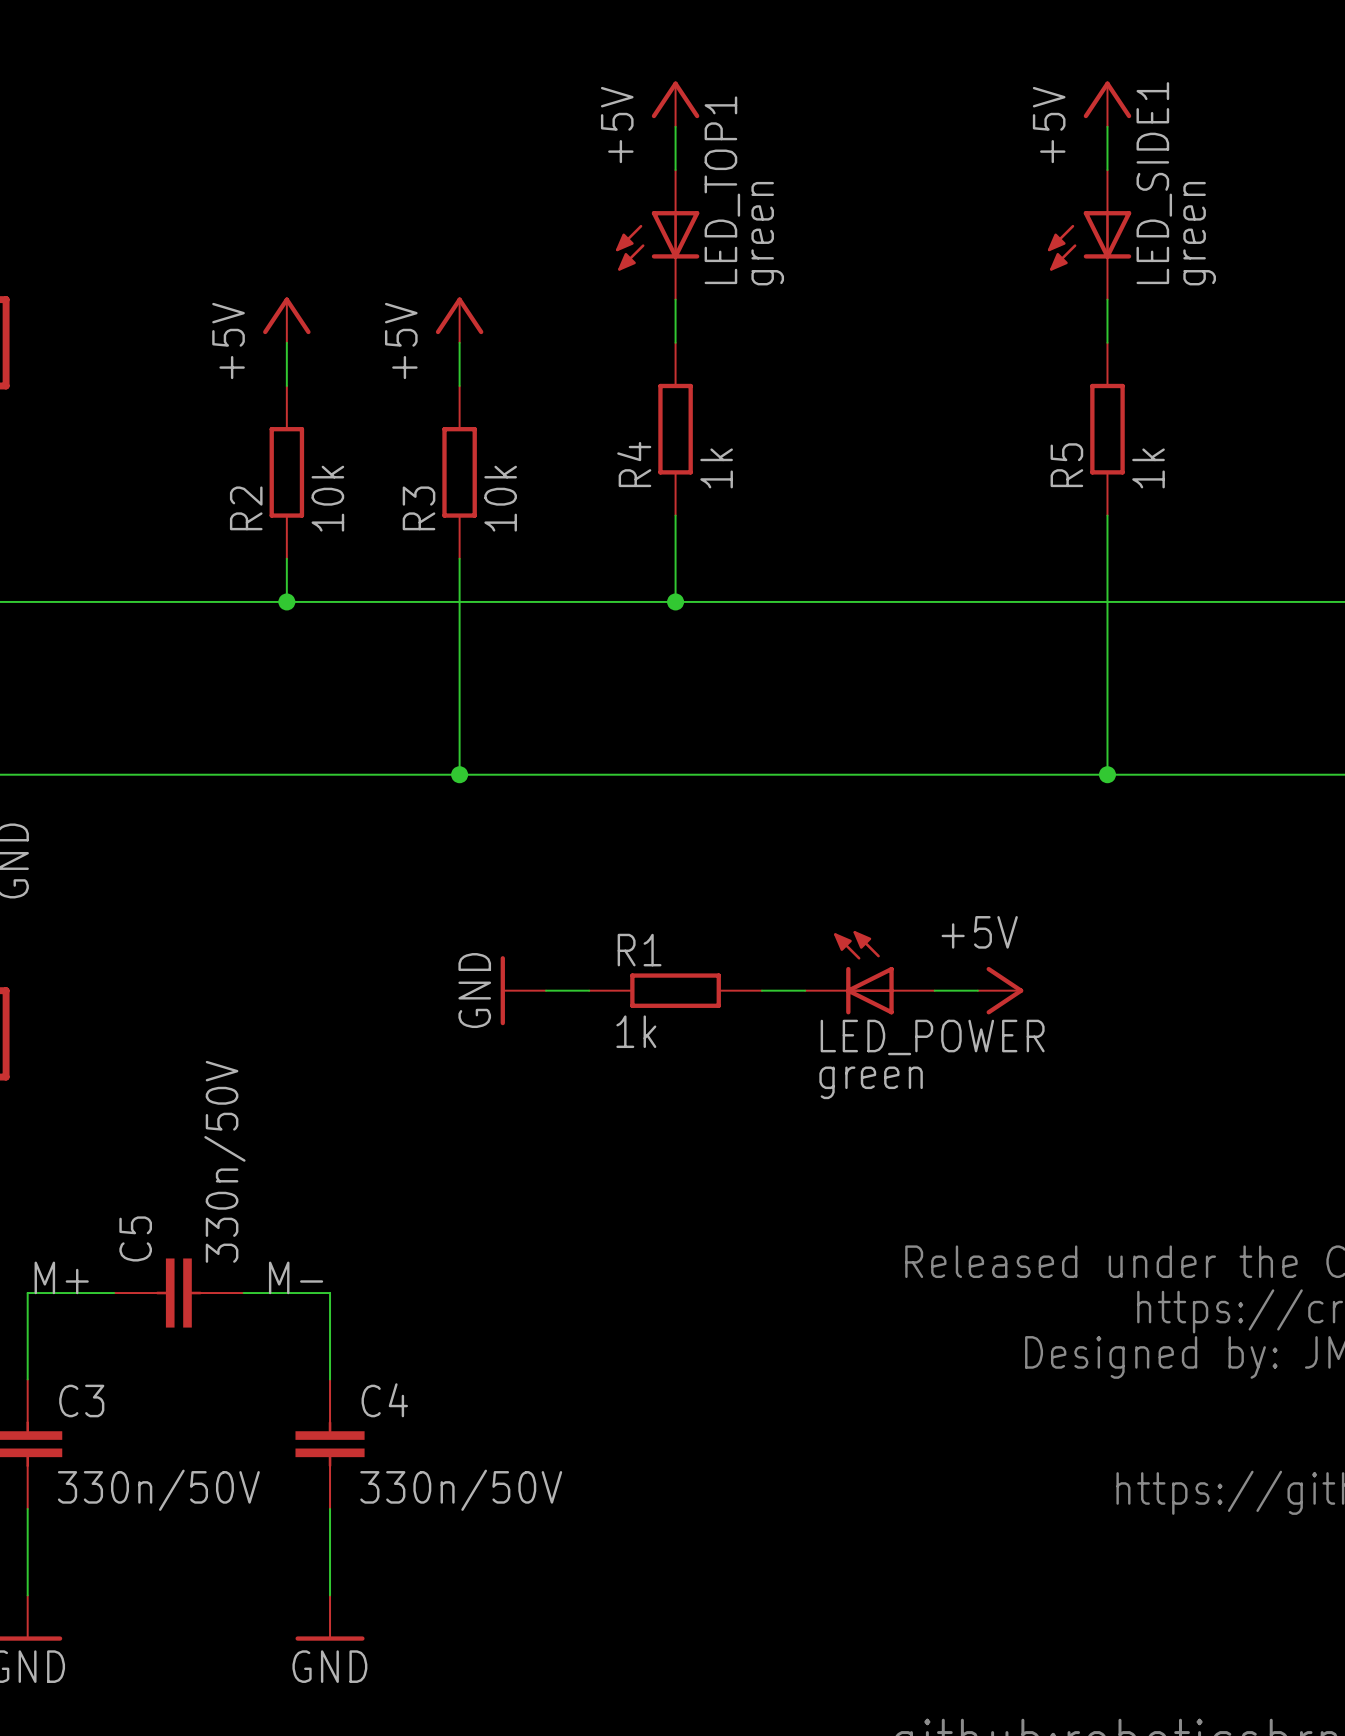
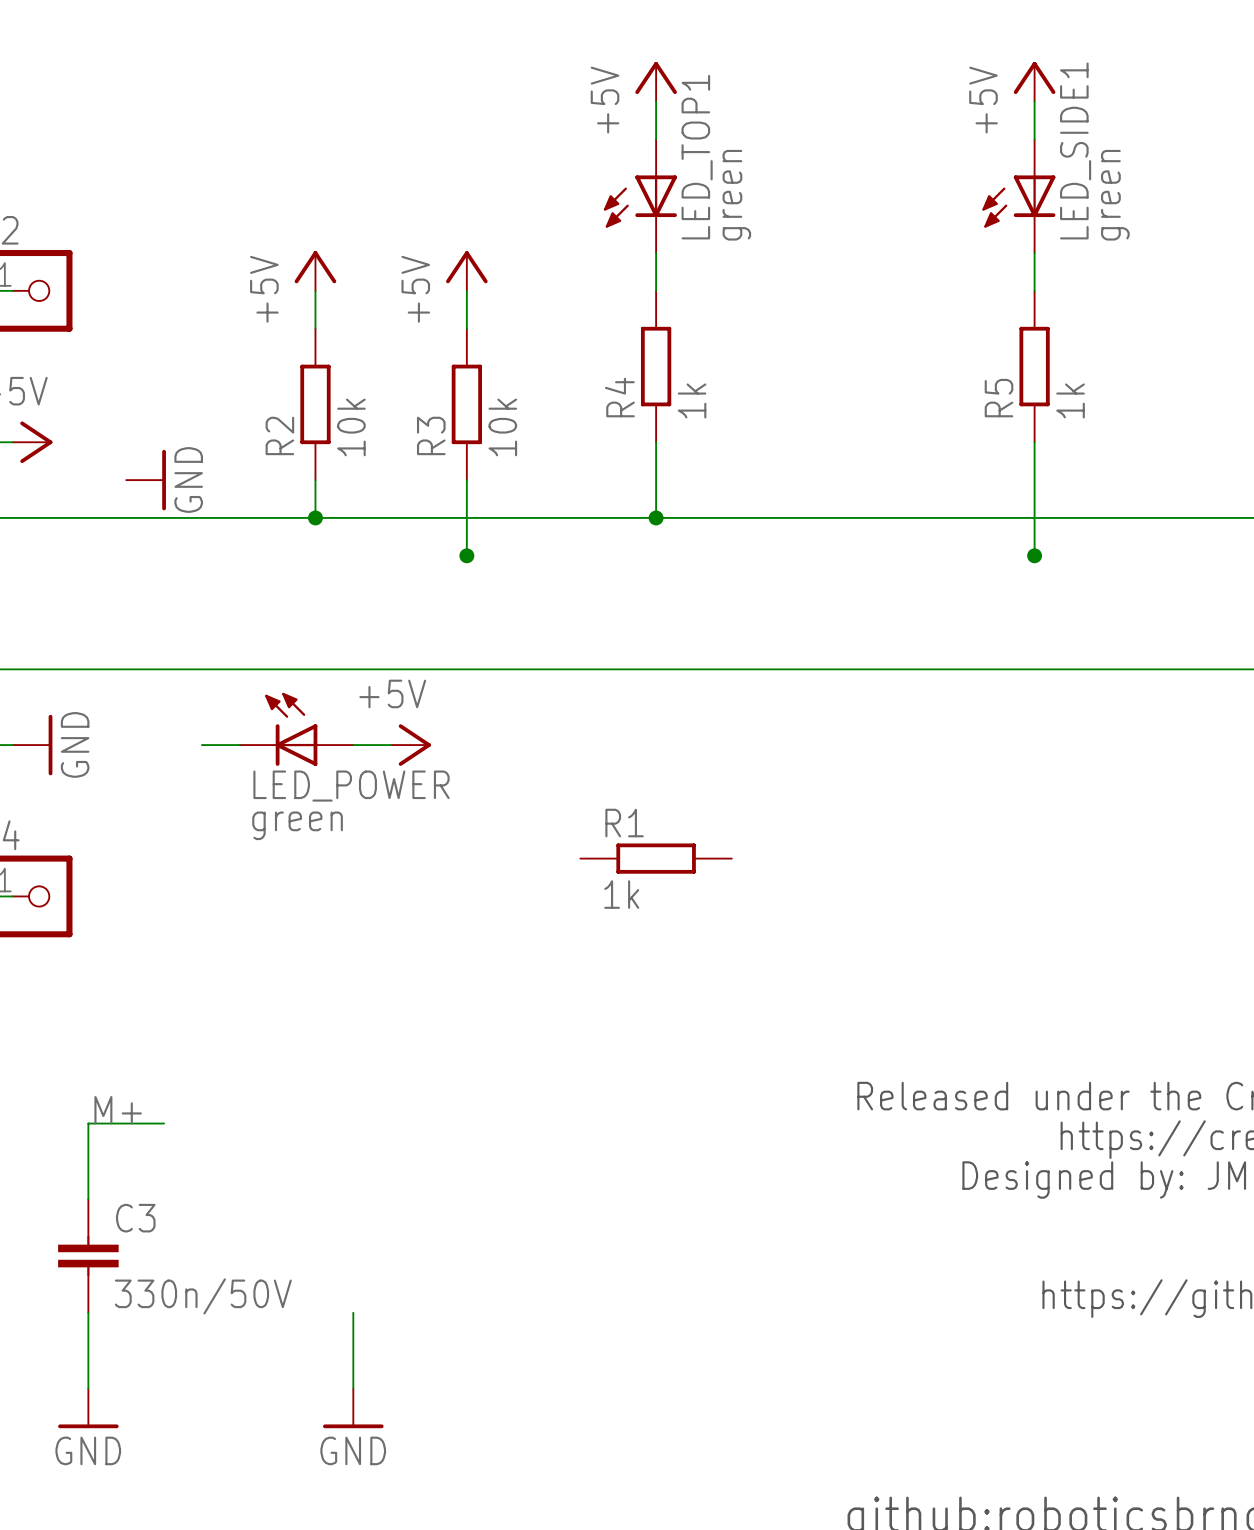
power symbol: none -> GND (146, 480)
wire: (459, 645) (459, 774) -> none
junction: none -> (466, 555)
wire: (1107, 645) (1107, 774) -> none
junction: none -> (1034, 555)
junction: (459, 774) -> none
junction: (1107, 774) -> none
LED_POWER: none -> green (296, 729)
wire: none -> (201, 745) (239, 745)
power symbol: none -> +5V (411, 745)
LED_POWER: green (869, 972) -> none
power symbol: GND (523, 990) -> none
wire: (545, 990) (589, 990) -> (353, 745) (391, 745)
wire: (761, 990) (805, 990) -> none
wire: (934, 990) (977, 990) -> none
power symbol: +5V (1000, 990) -> none
label: M- (296, 1277) -> none
C5: 330n/50V (178, 1293) -> none
wire: (243, 1293) (330, 1293) (330, 1379) -> none
C4: 330n/50V (330, 1444) -> none

